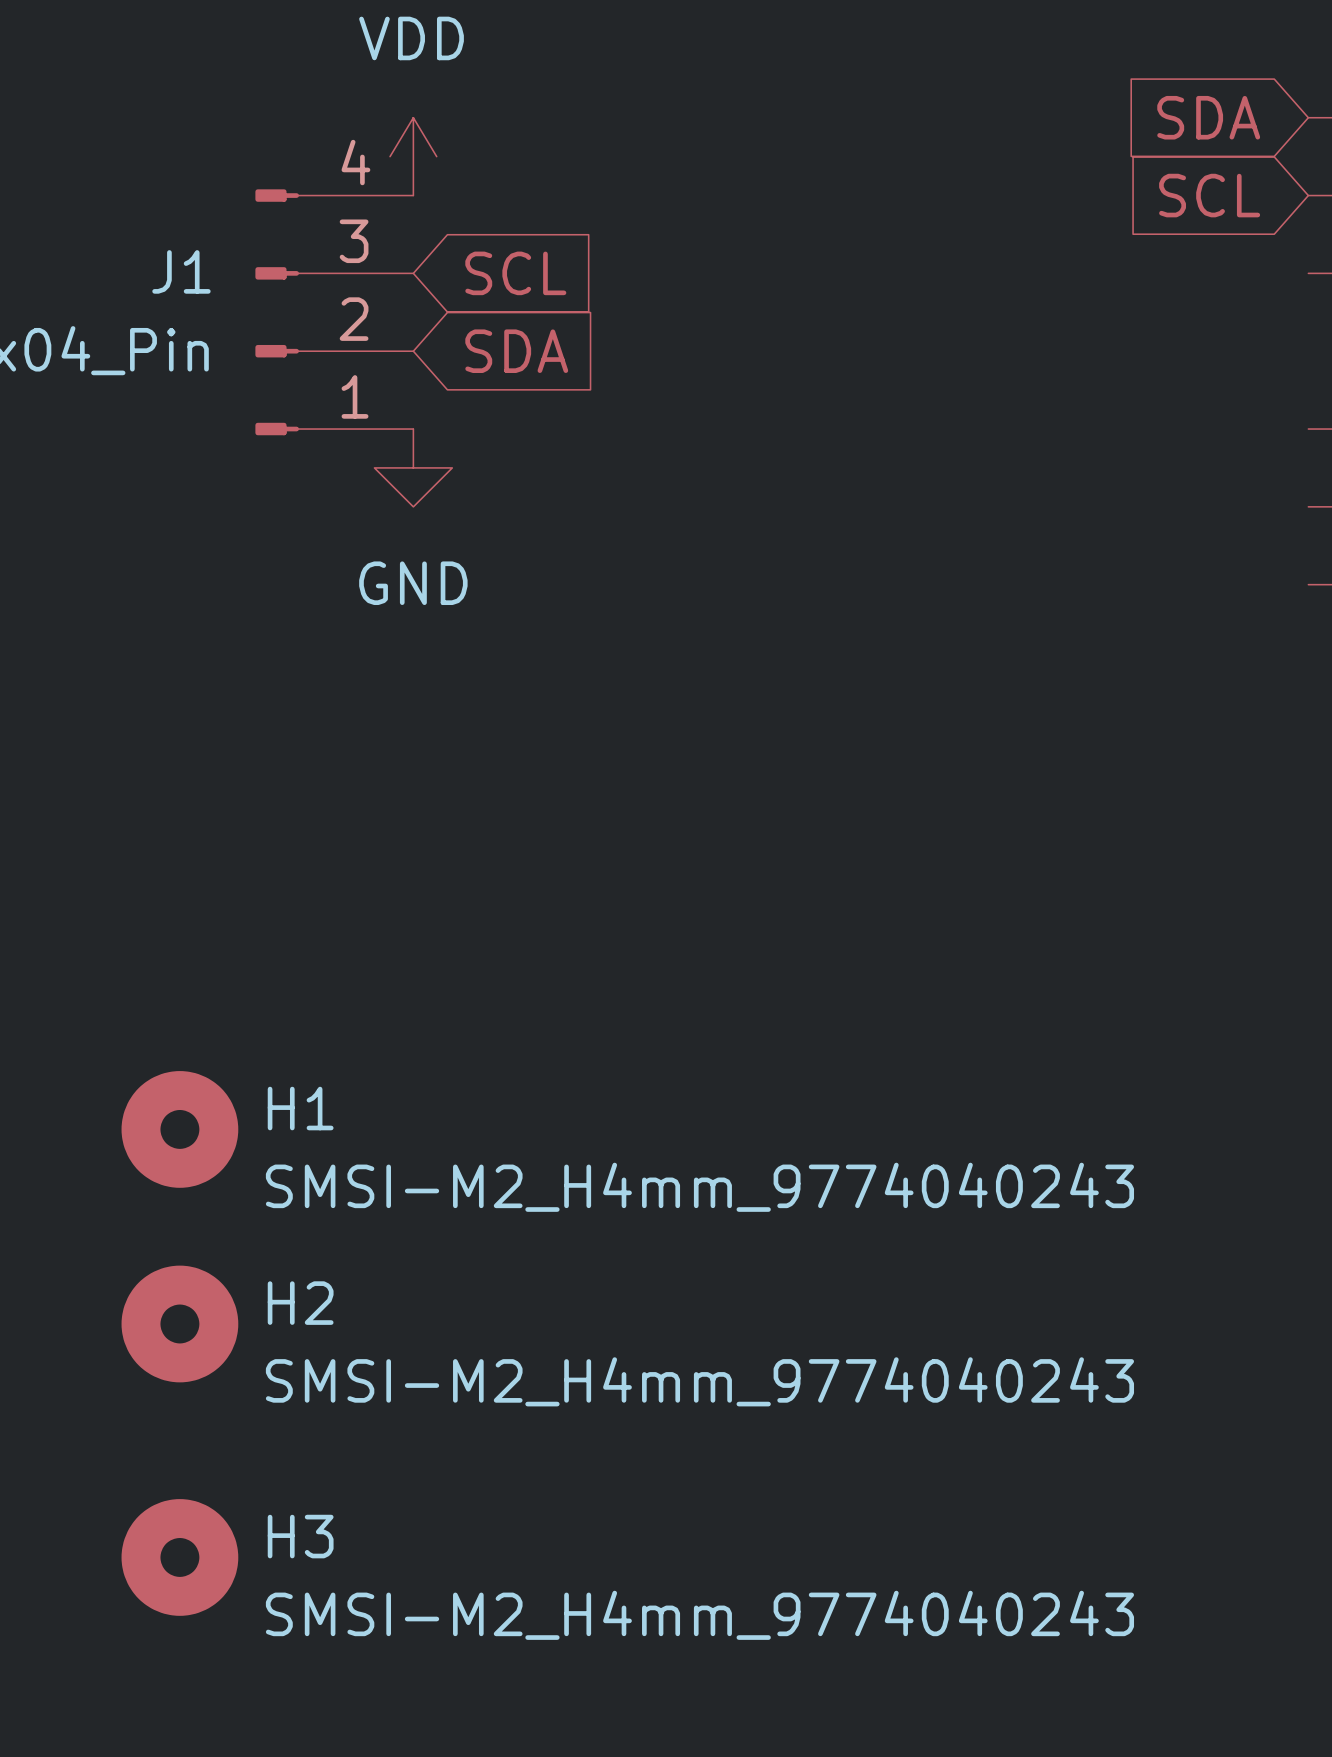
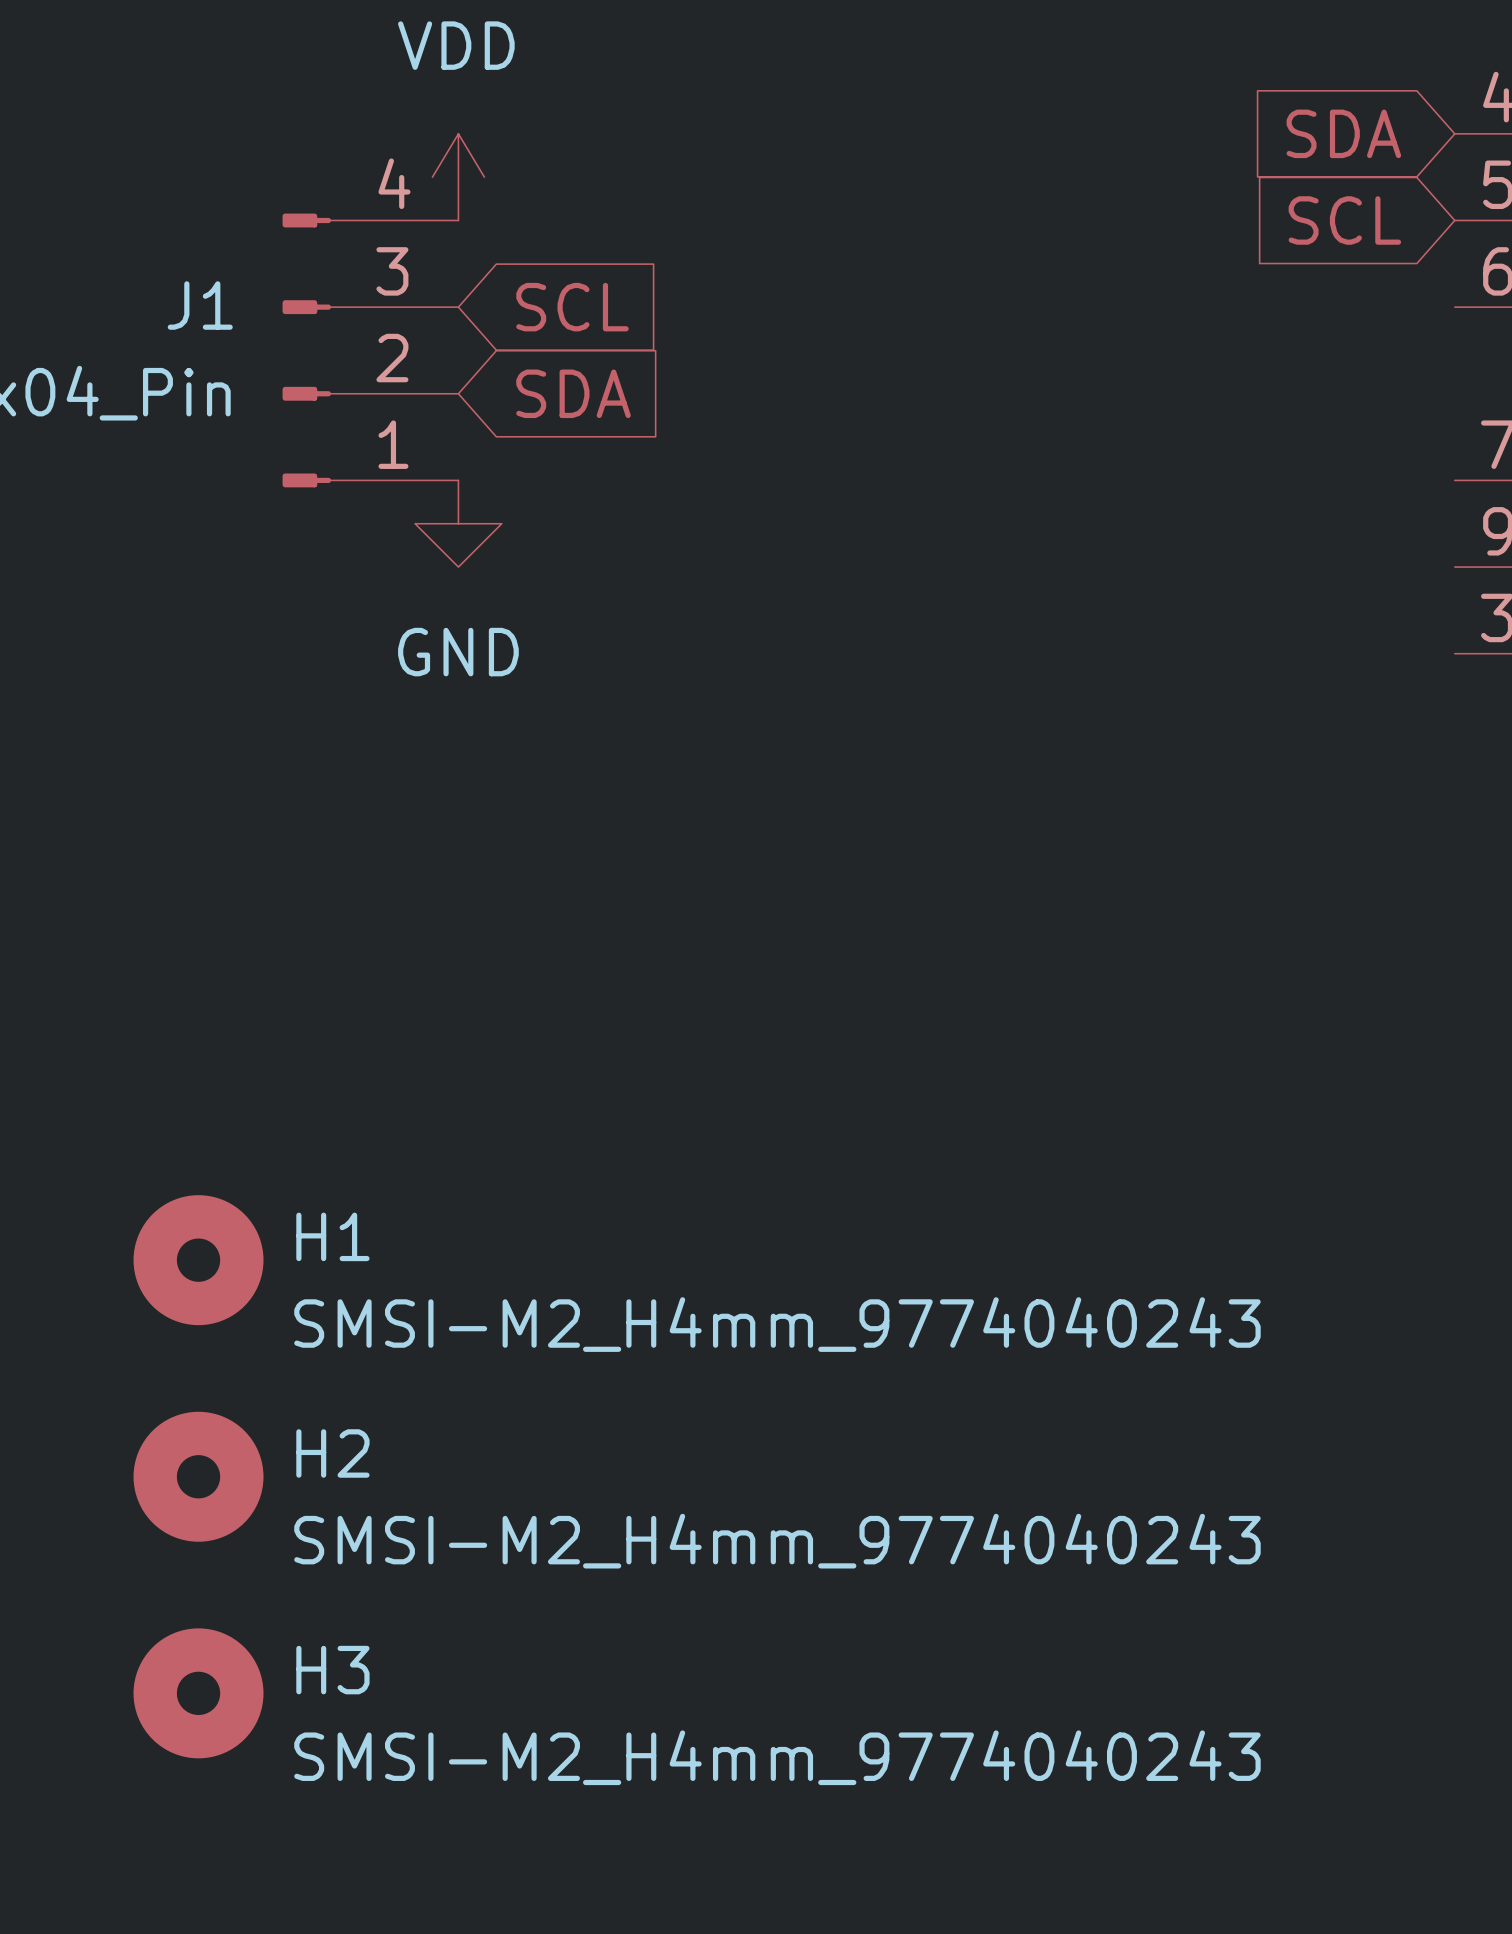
H3 position: (179, 1557) -> (198, 1693)

